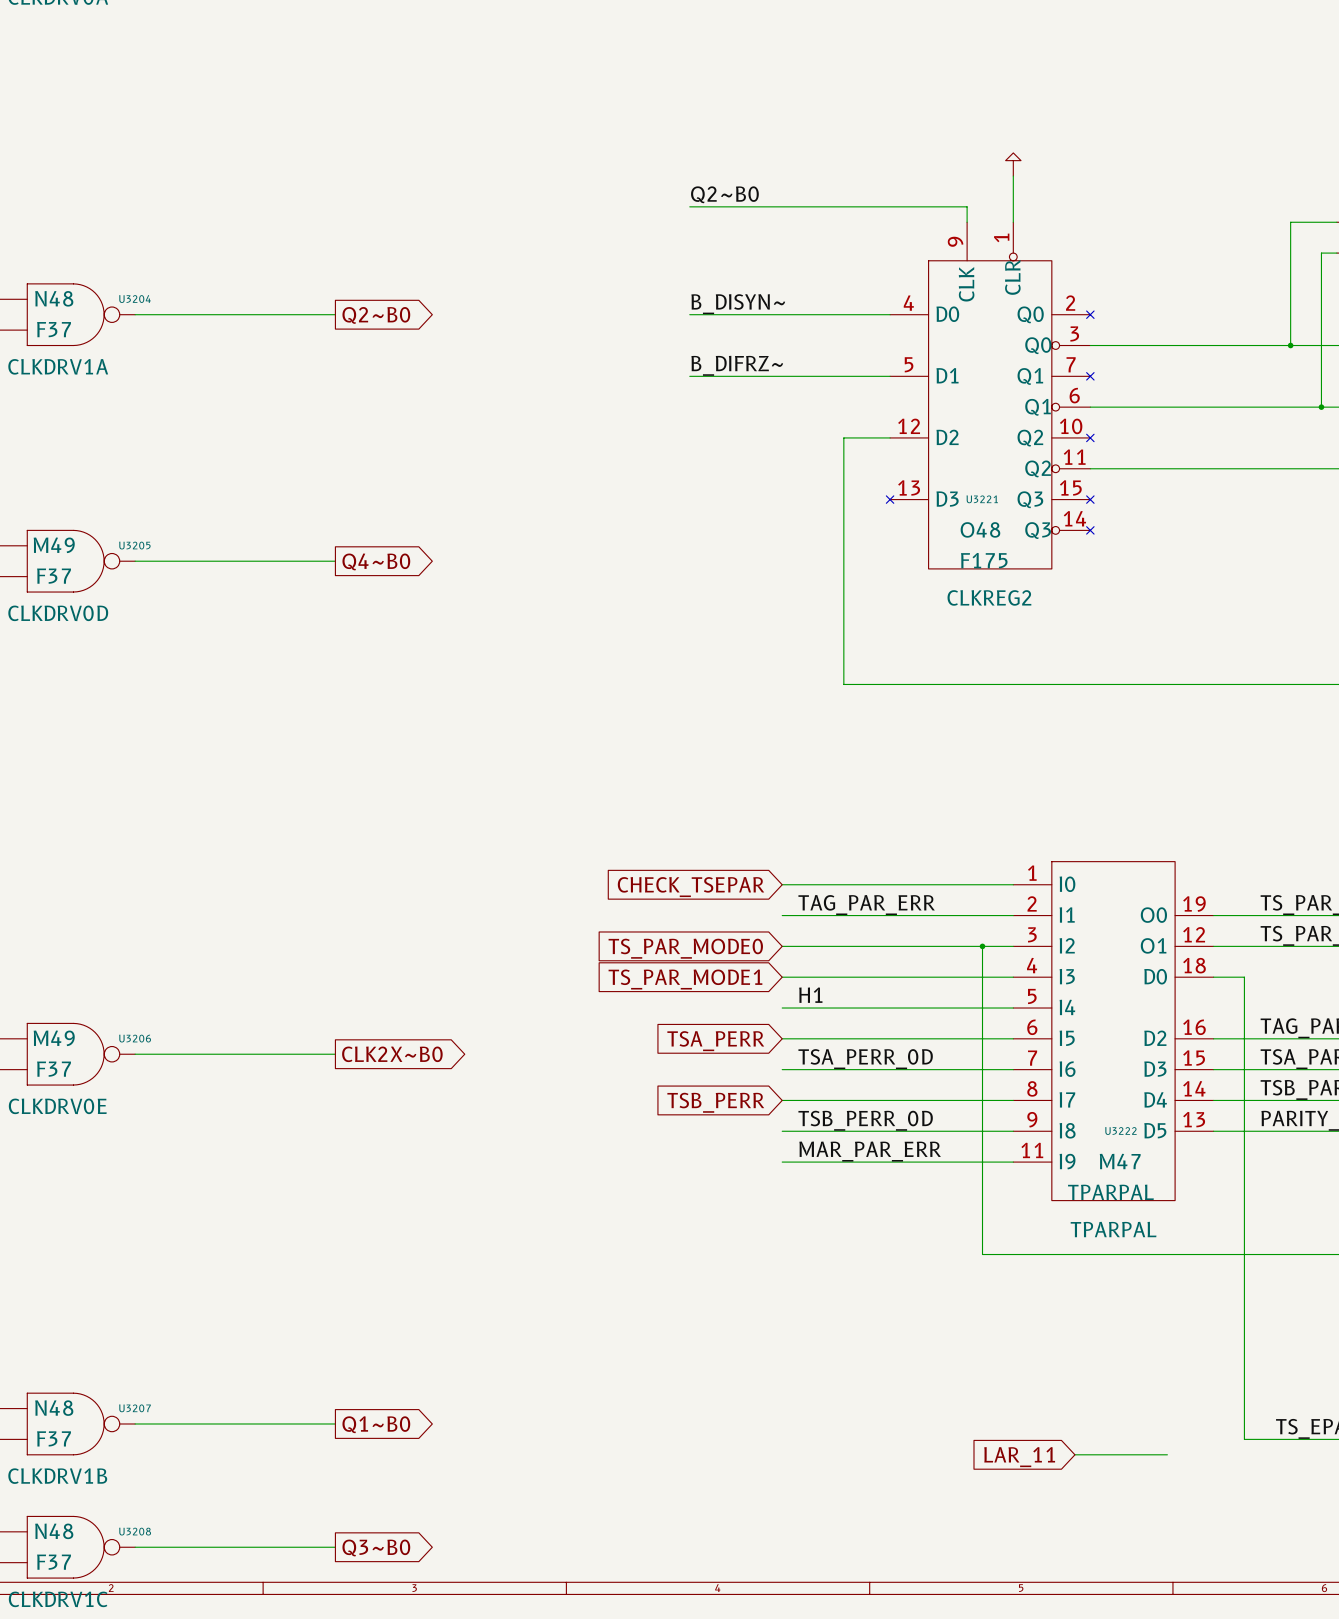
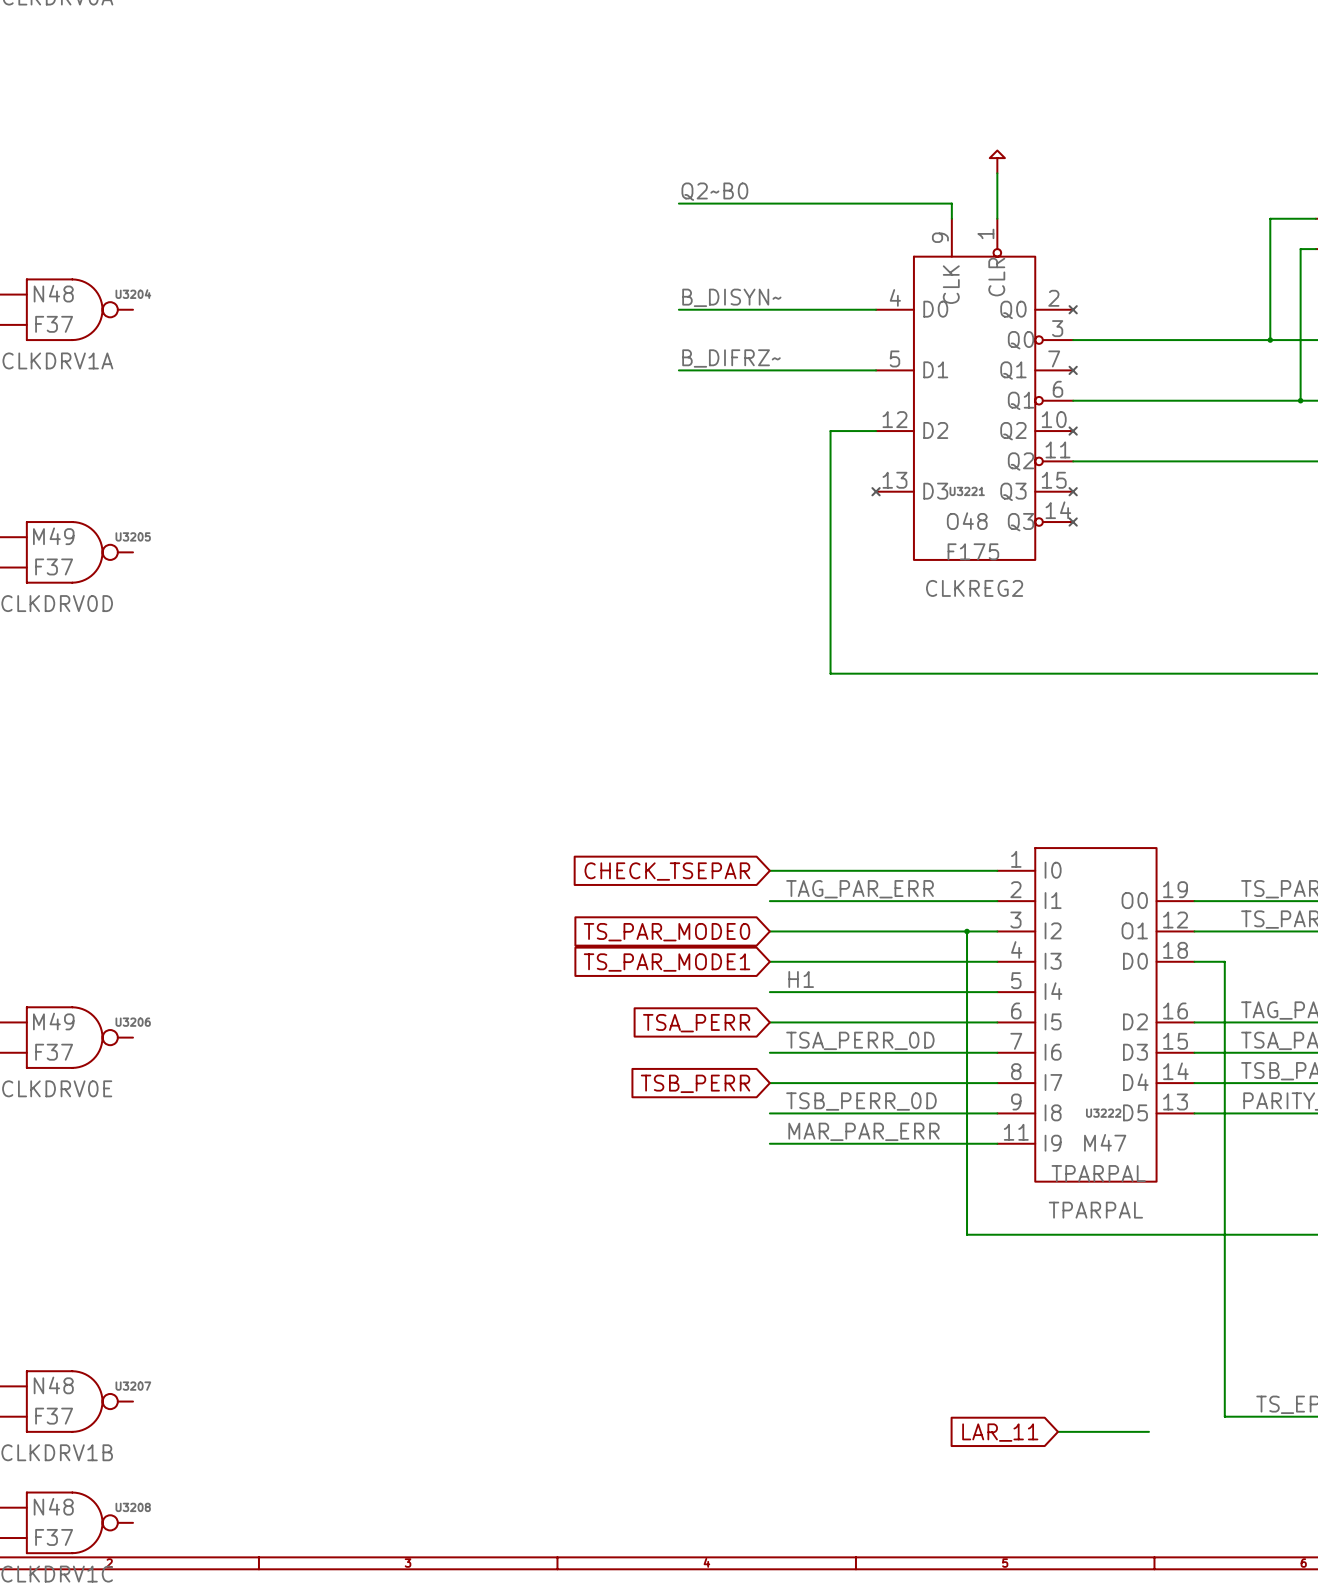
wire: (135, 314) (335, 314) -> none
global label: Q2~B0 (376, 315) -> none
wire: (135, 561) (335, 561) -> none
global label: Q4~B0 (376, 561) -> none
wire: (135, 1054) (335, 1054) -> none
global label: CLK2X~B0 (392, 1054) -> none
wire: (135, 1423) (335, 1423) -> none
global label: Q1~B0 (376, 1424) -> none
wire: (135, 1547) (335, 1547) -> none
global label: Q3~B0 (376, 1547) -> none

